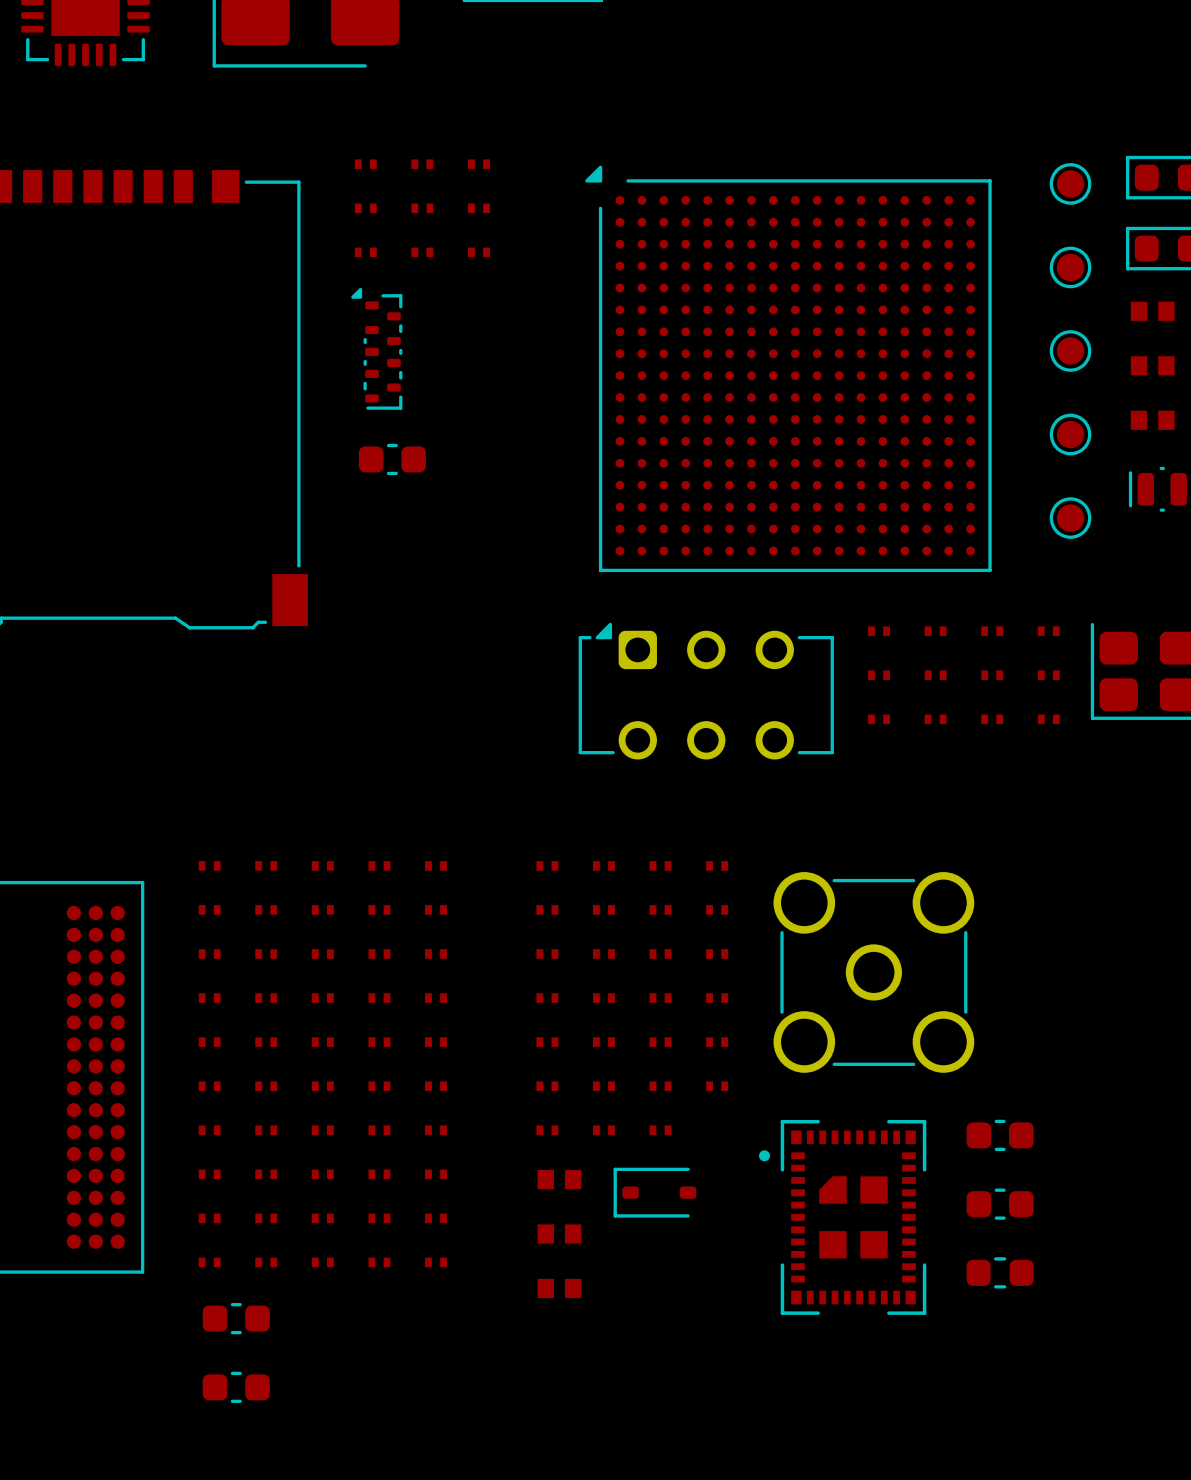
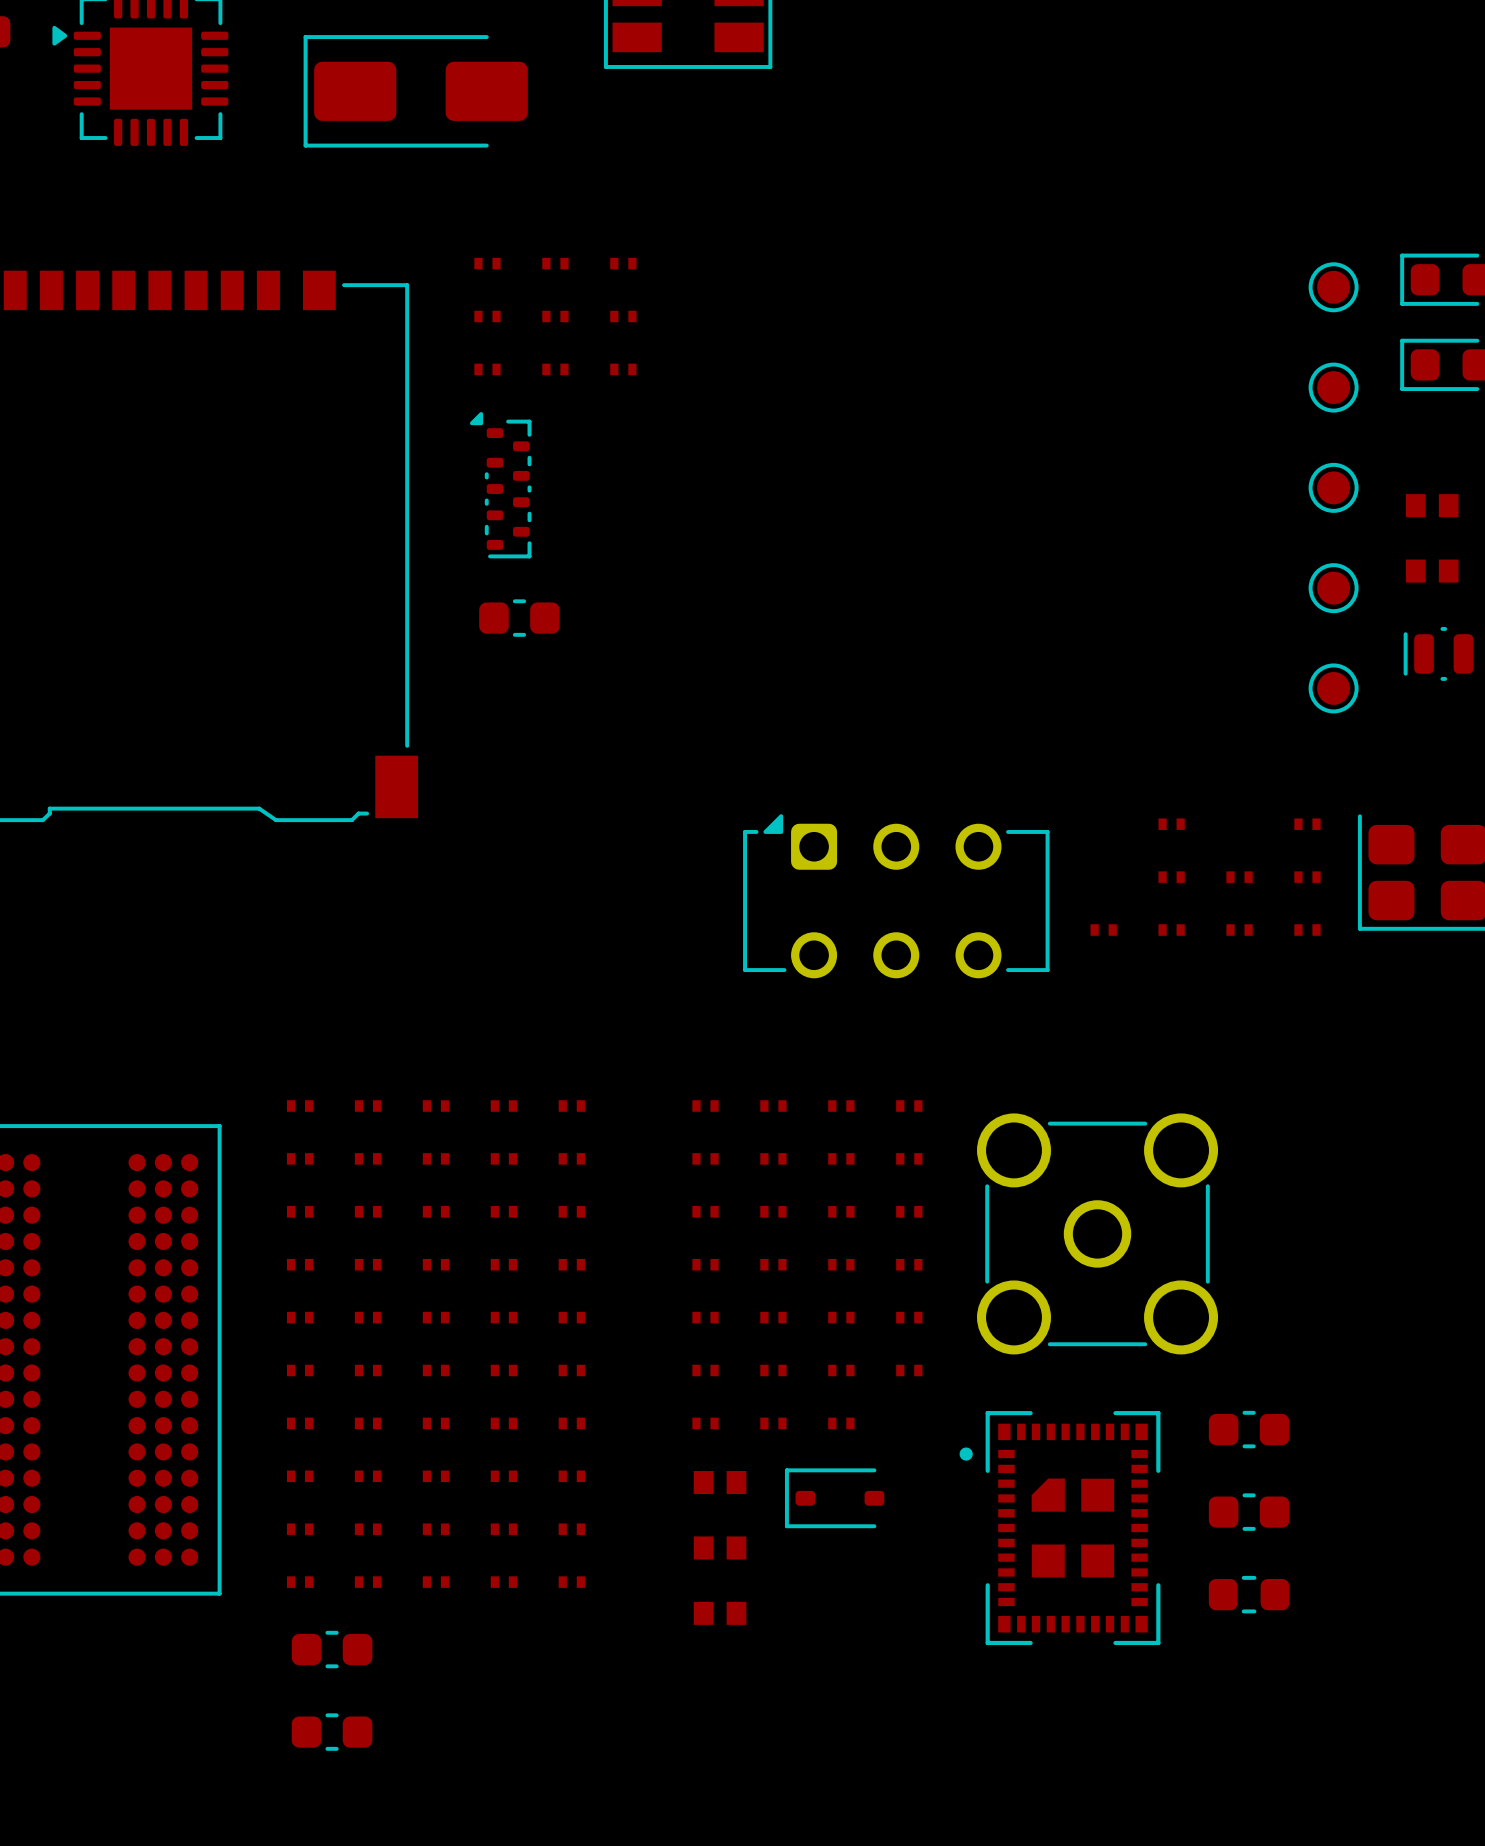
part: (1152, 311) -> none
part: (788, 368) -> none
part: (879, 631) -> none
part: (992, 631) -> none
part: (879, 675) -> none

